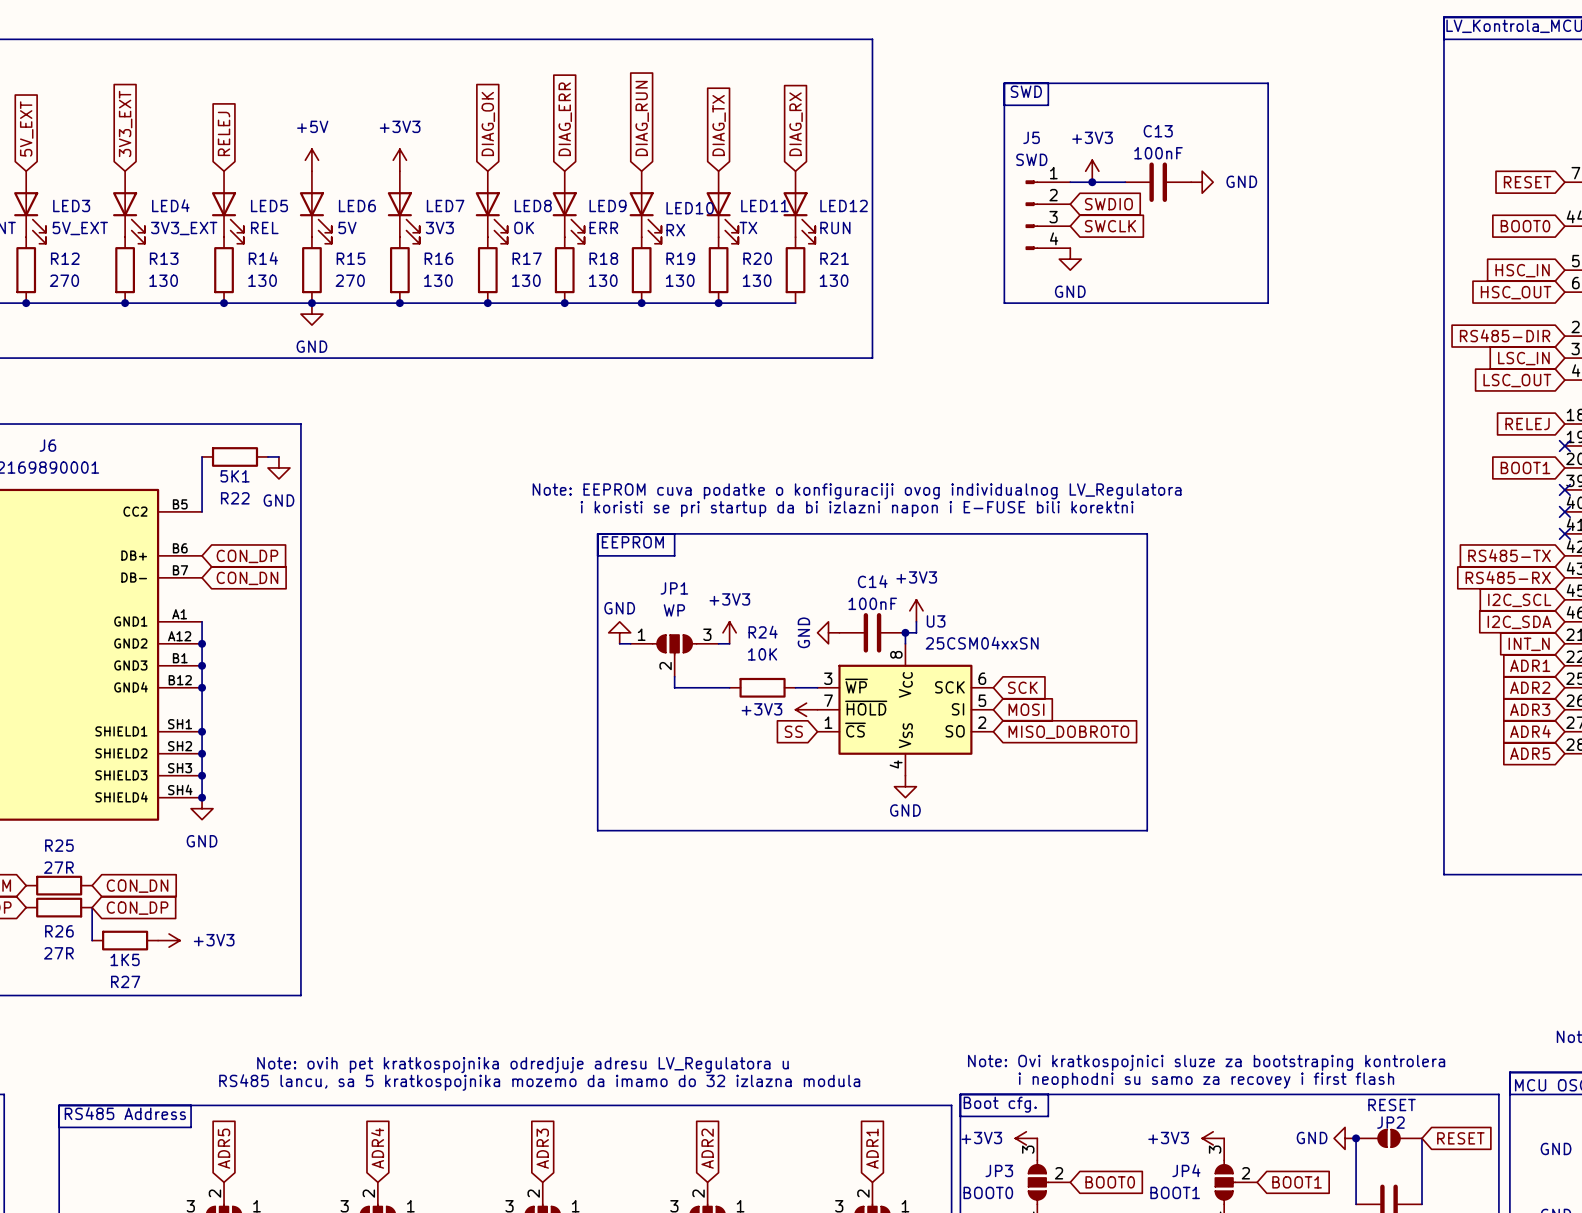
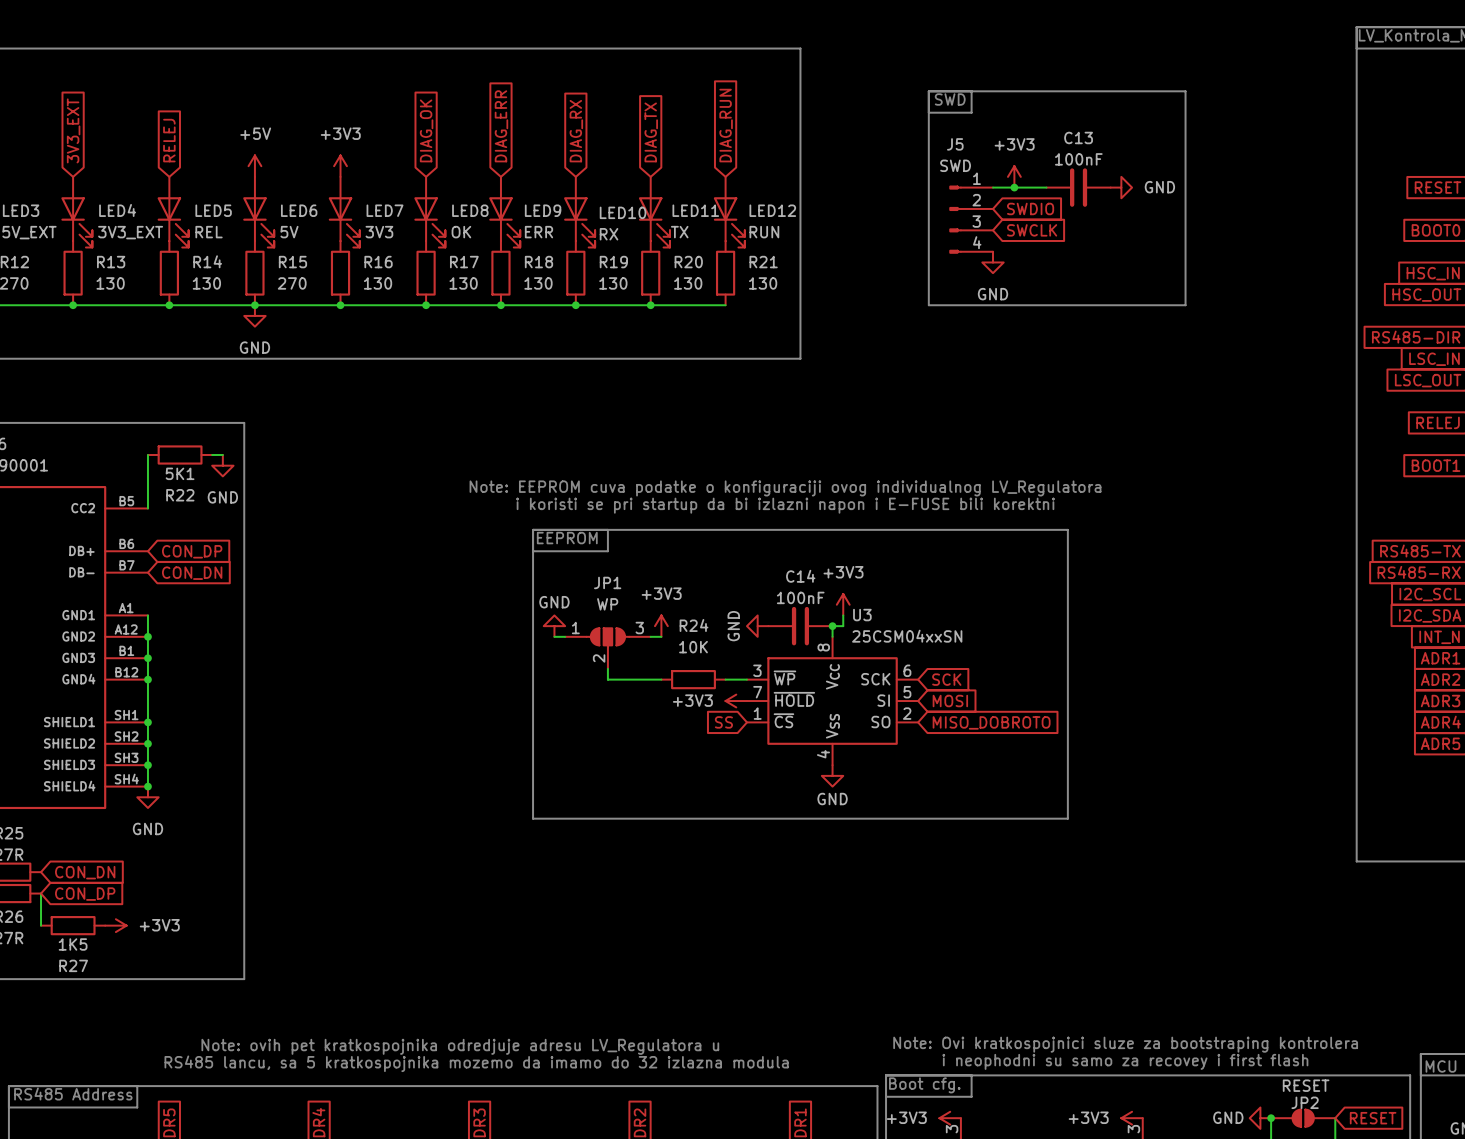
global label: DIAG_RUN (642, 118) -> DIAG_RX (576, 131)
global label: DIAG_RX (796, 124) -> DIAG_RUN (726, 125)

